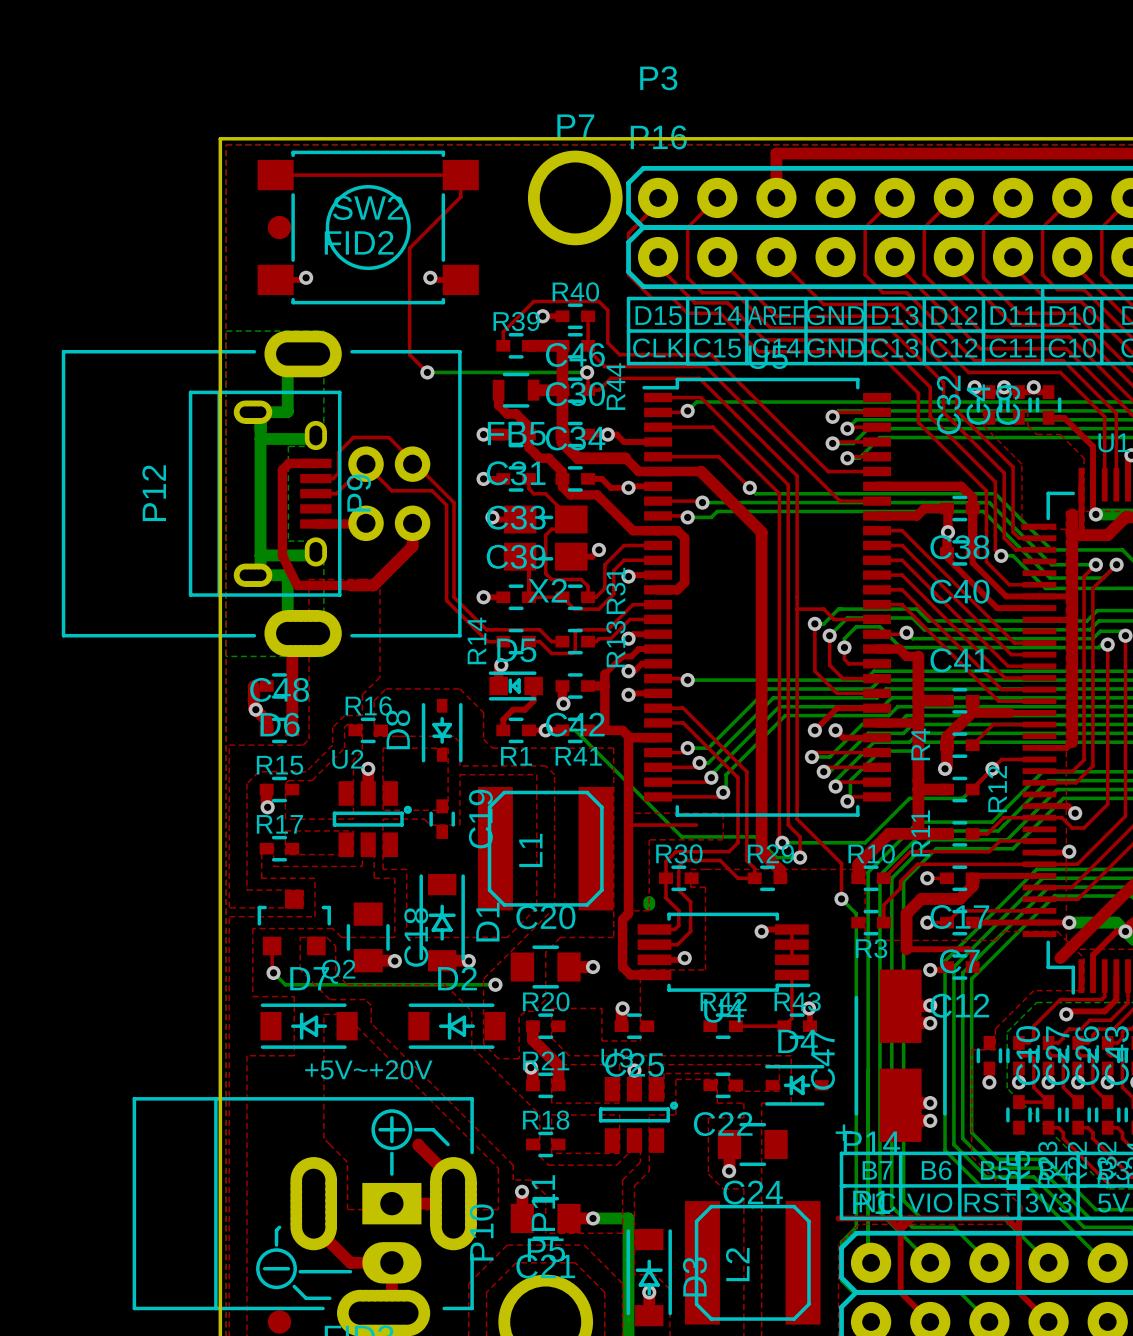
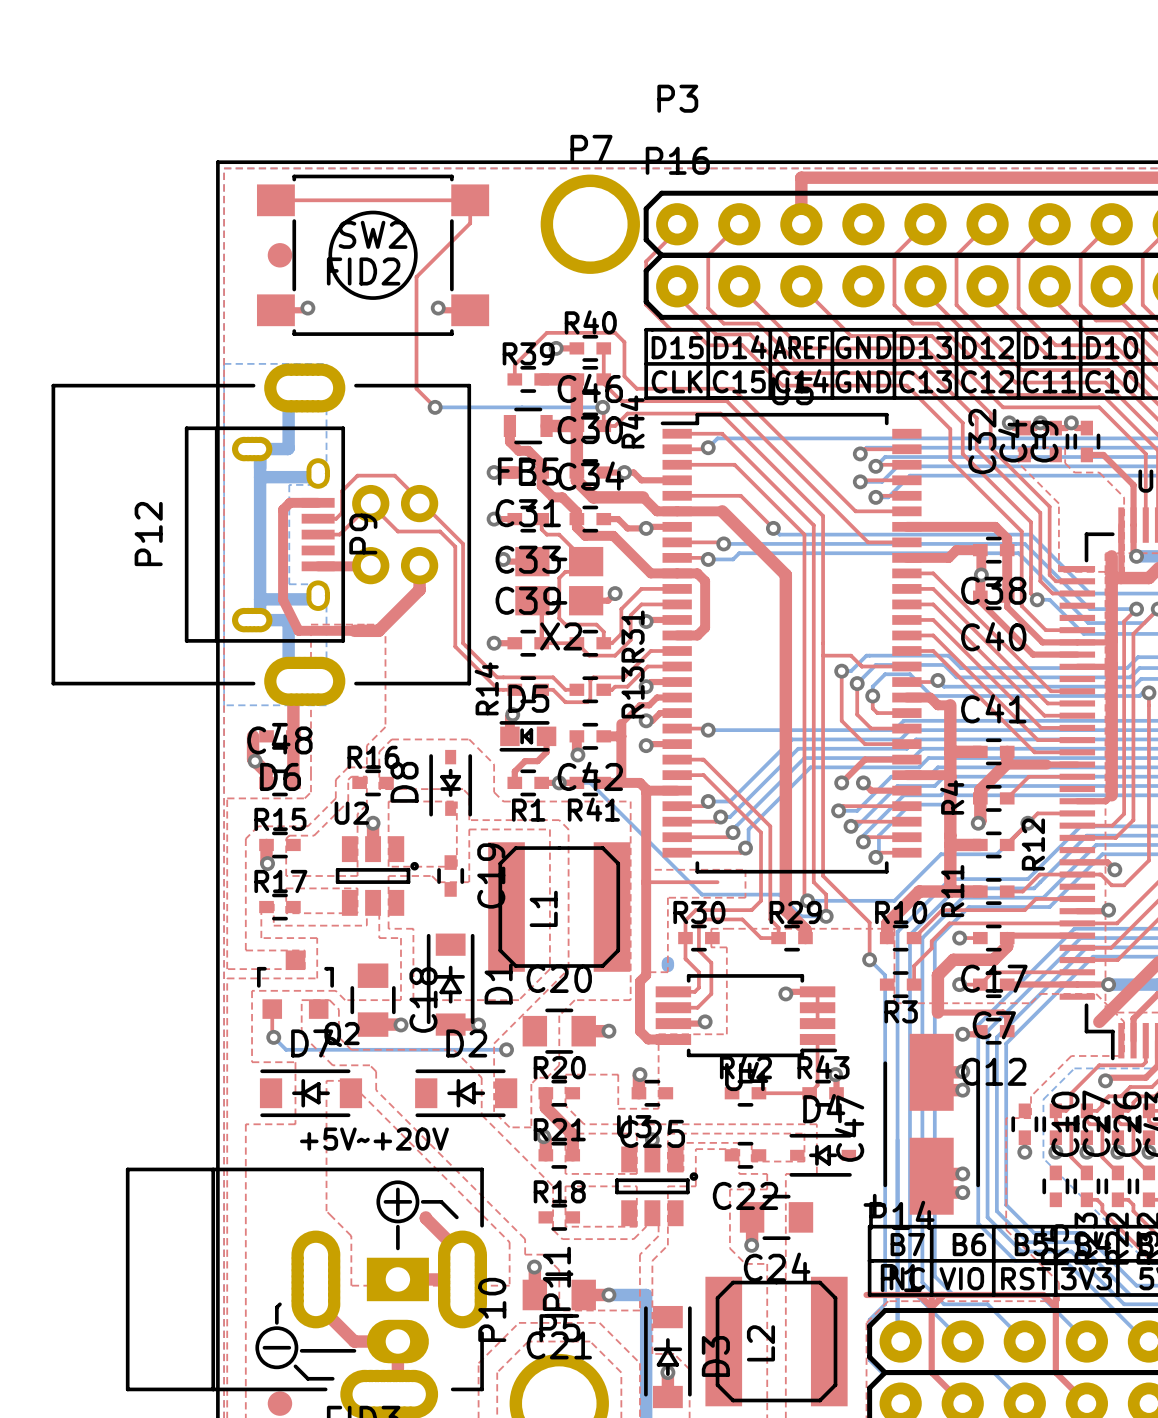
top track: (1018, 1102) (1048, 1102) -> none

